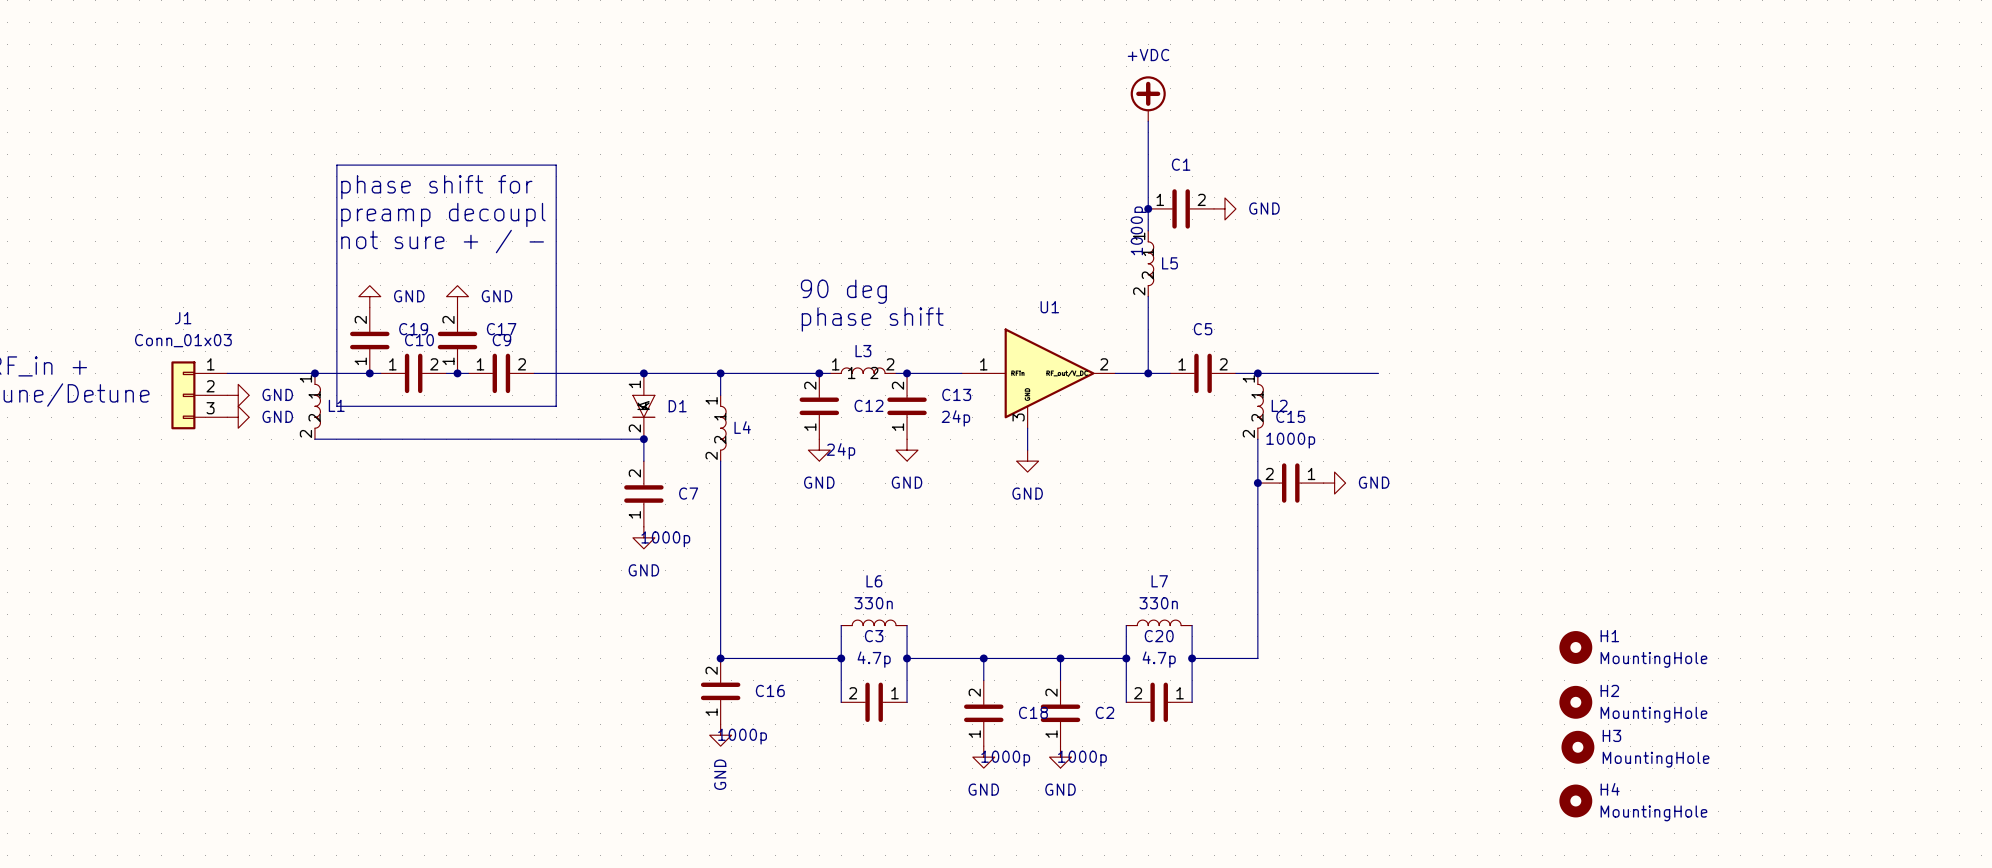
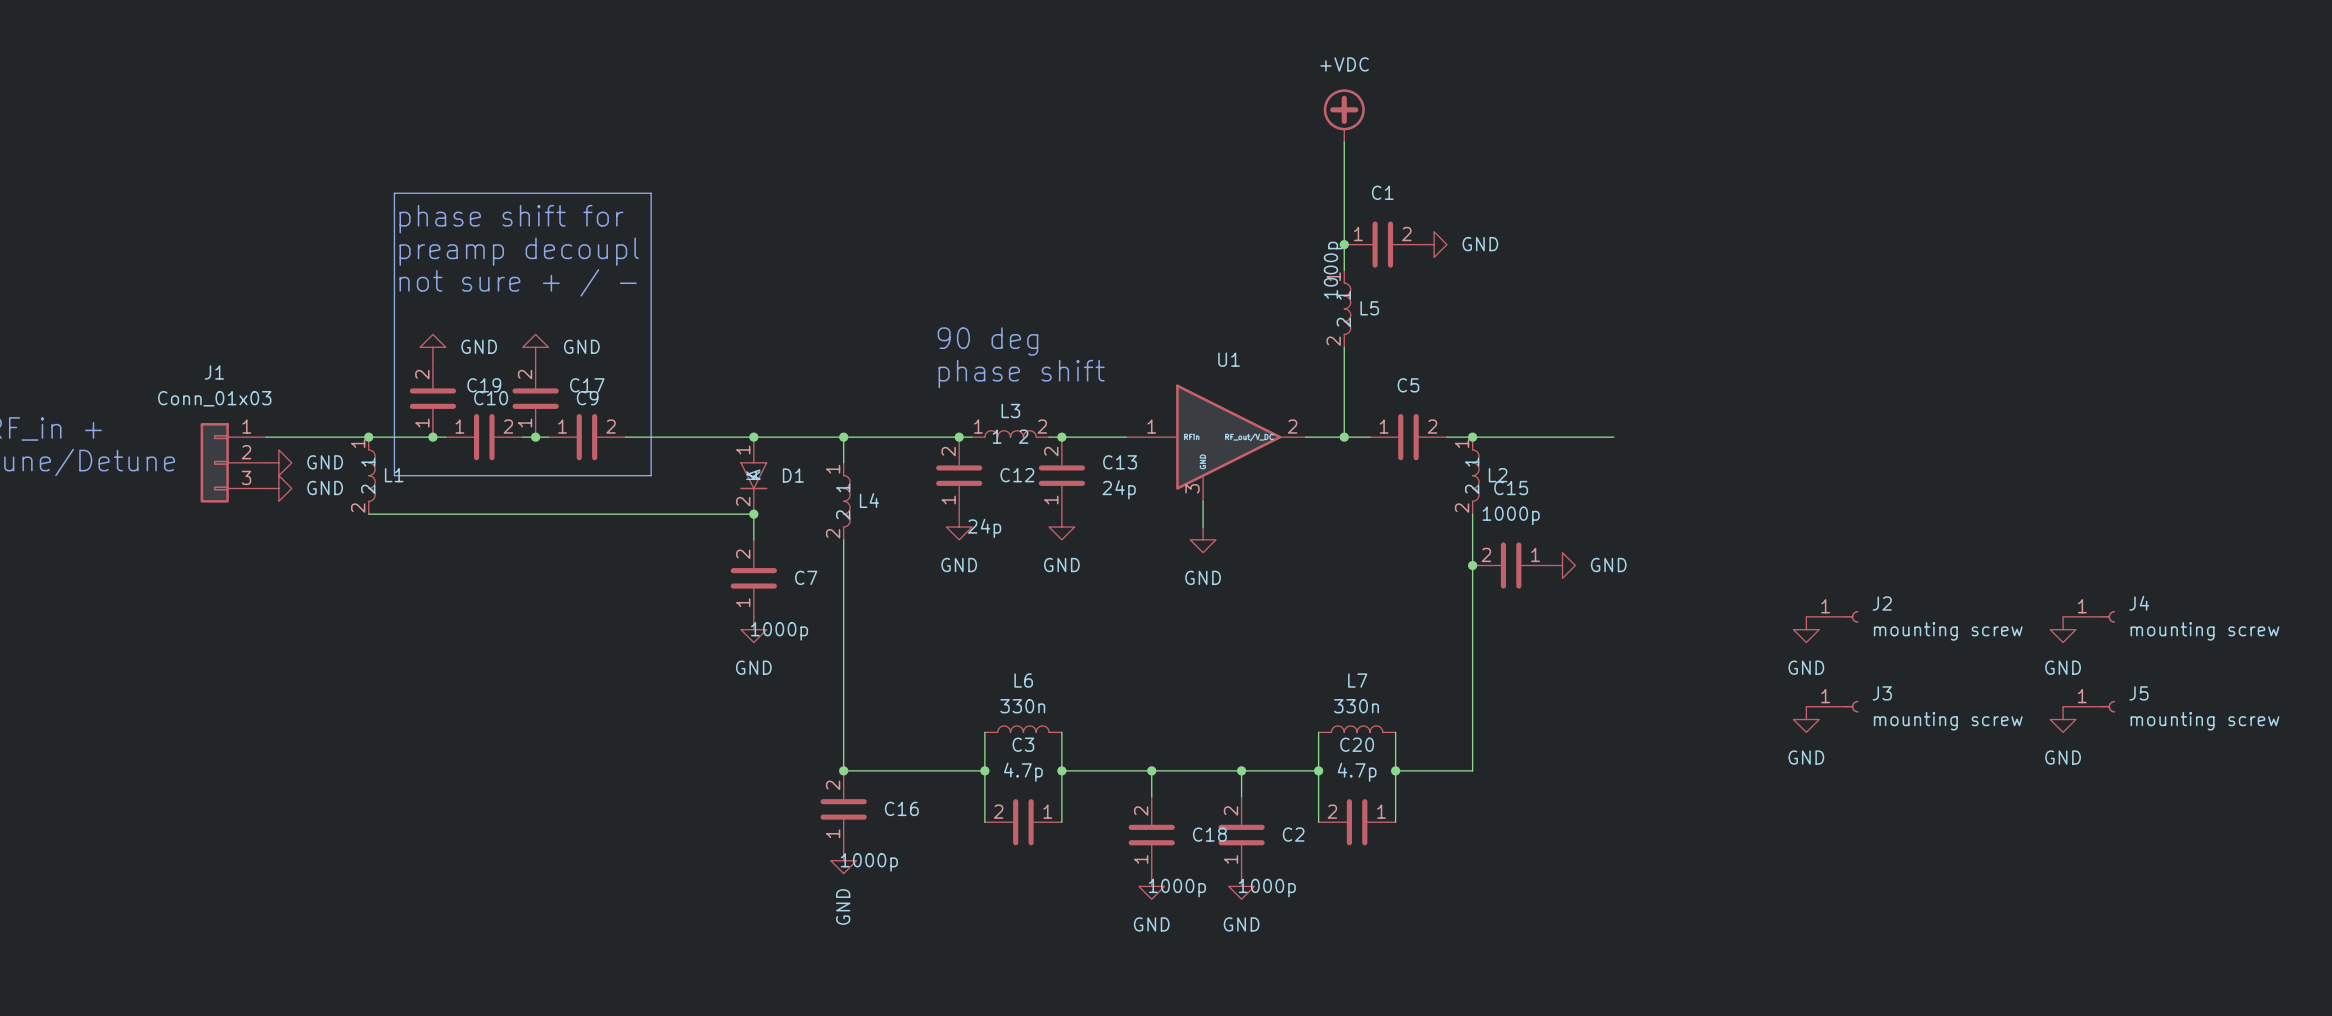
J2: none -> mounting screw (1832, 616)
J4: none -> mounting screw (2089, 616)
power symbol: none -> GND (1806, 629)
power symbol: none -> GND (2063, 629)
J3: none -> mounting screw (1832, 706)
J5: none -> mounting screw (2089, 706)
power symbol: none -> GND (1806, 719)
power symbol: none -> GND (2063, 719)
H1: MountingHole (1575, 647) -> none
H2: MountingHole (1575, 702) -> none
H3: MountingHole (1577, 747) -> none
H4: MountingHole (1575, 800) -> none

